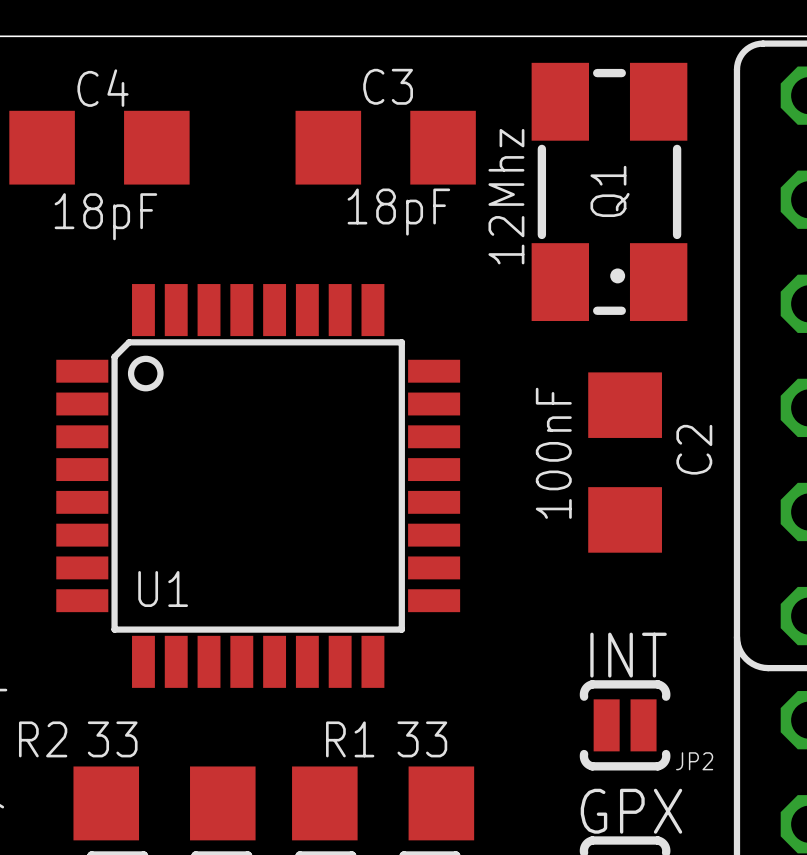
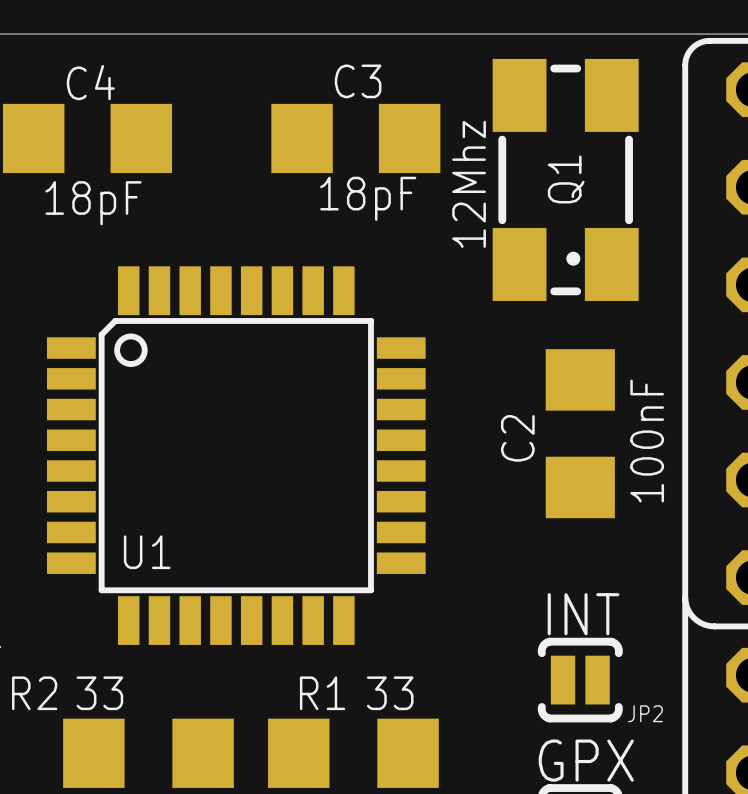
C2 name position: C2 (694, 449) -> C2 (517, 438)
C2 value position: 100nF (553, 453) -> 100nF (647, 441)

